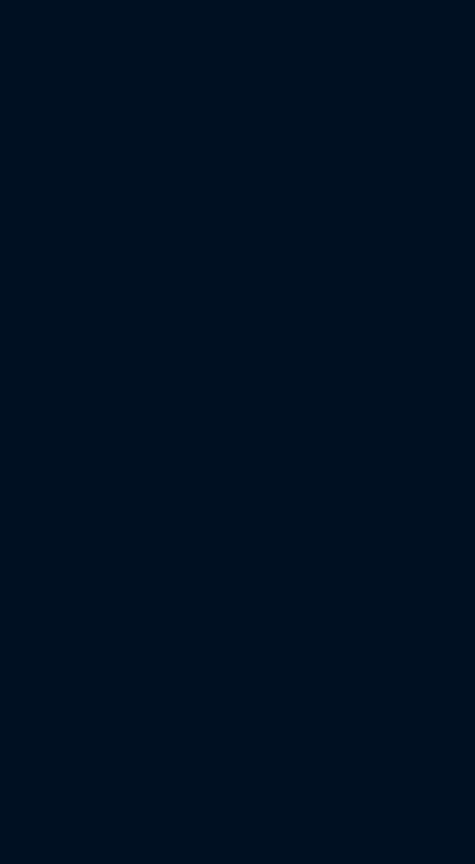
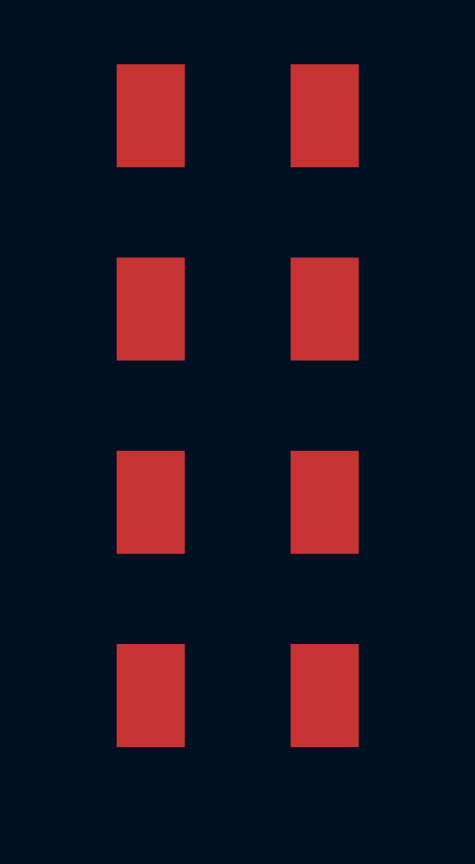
part: none -> (237, 115)
part: none -> (237, 309)
part: none -> (237, 502)
part: none -> (237, 695)

